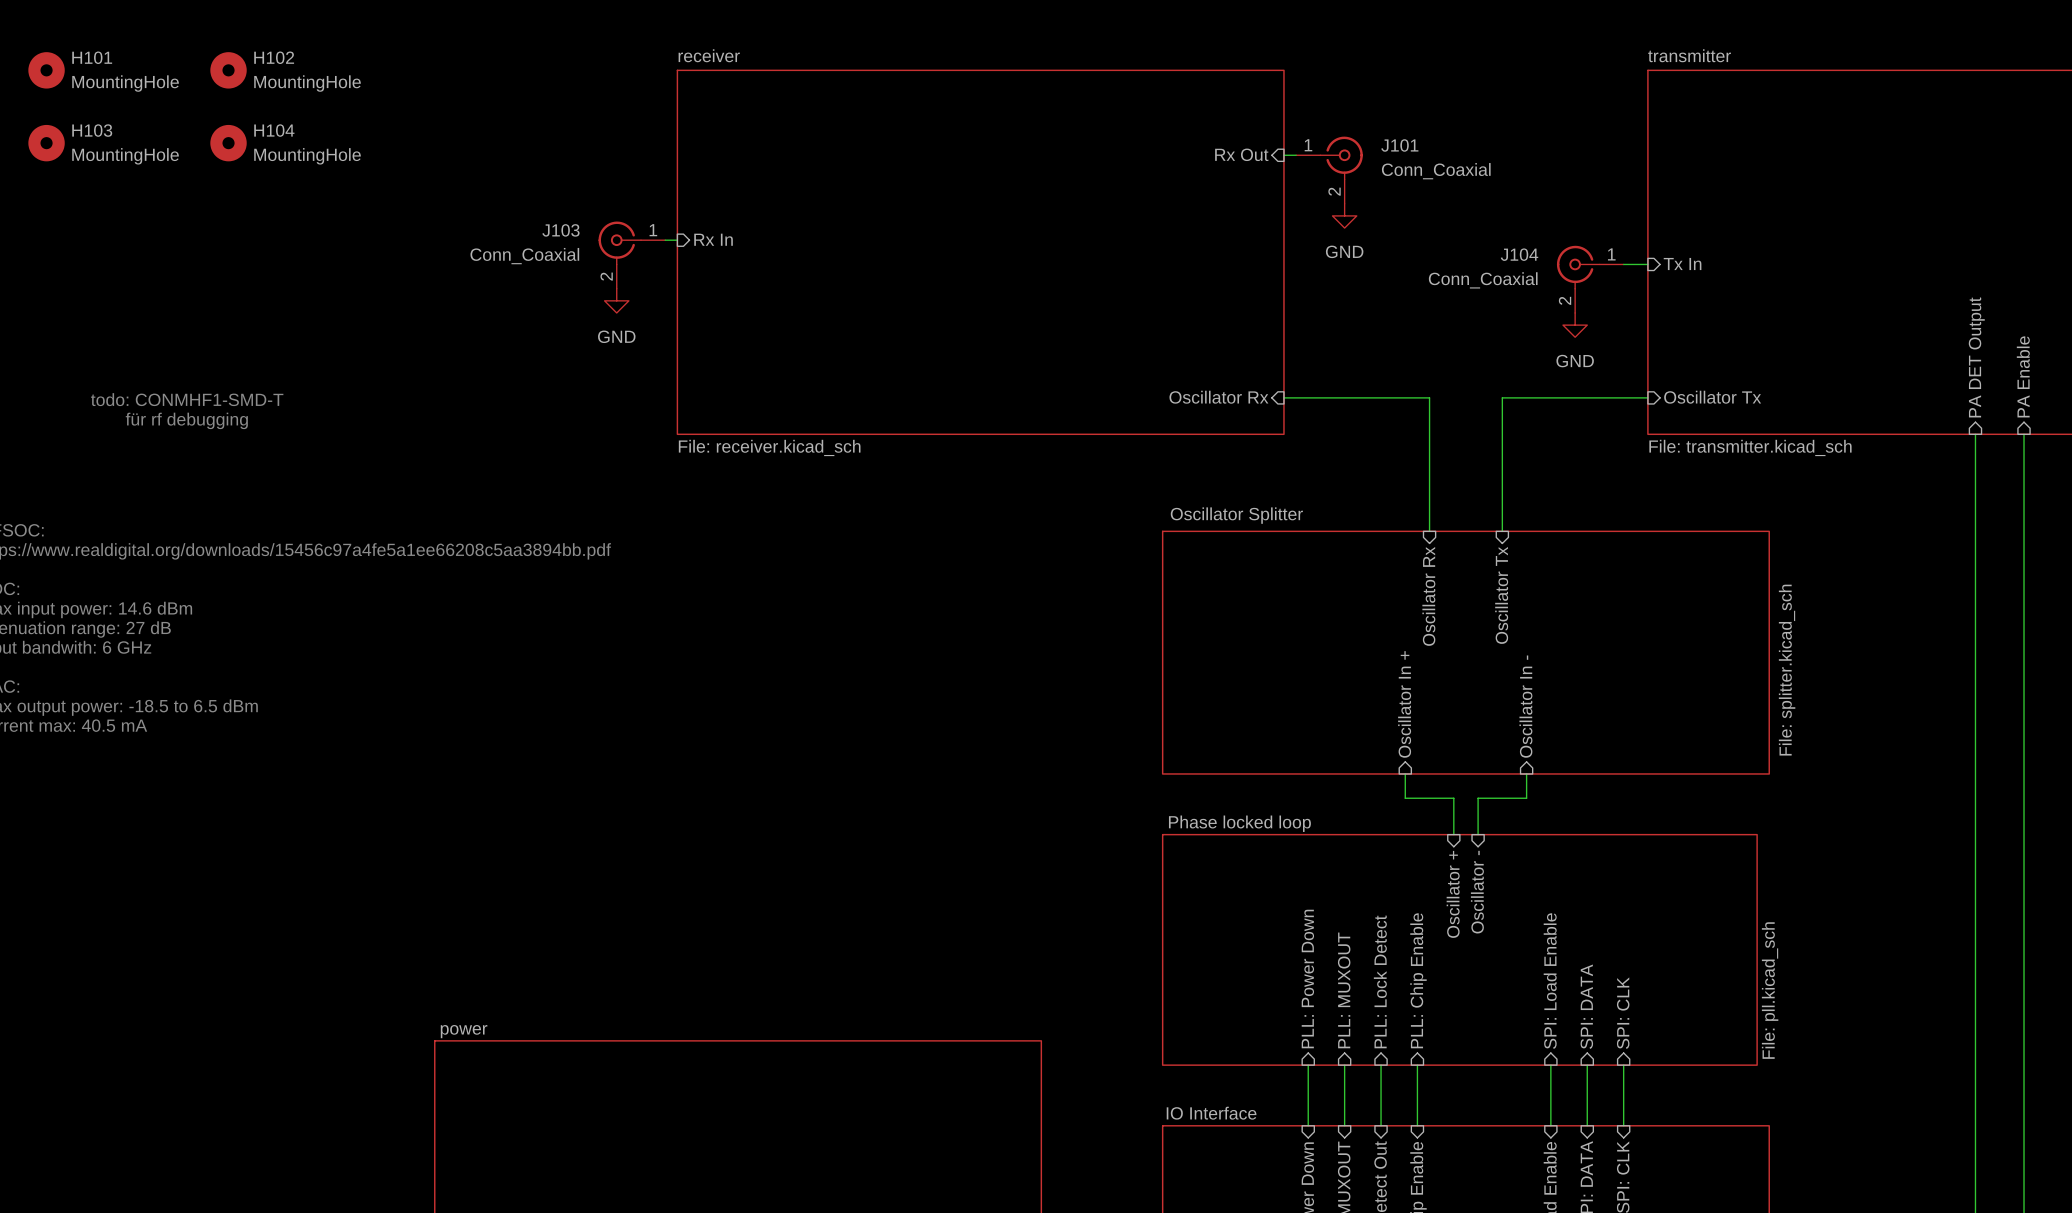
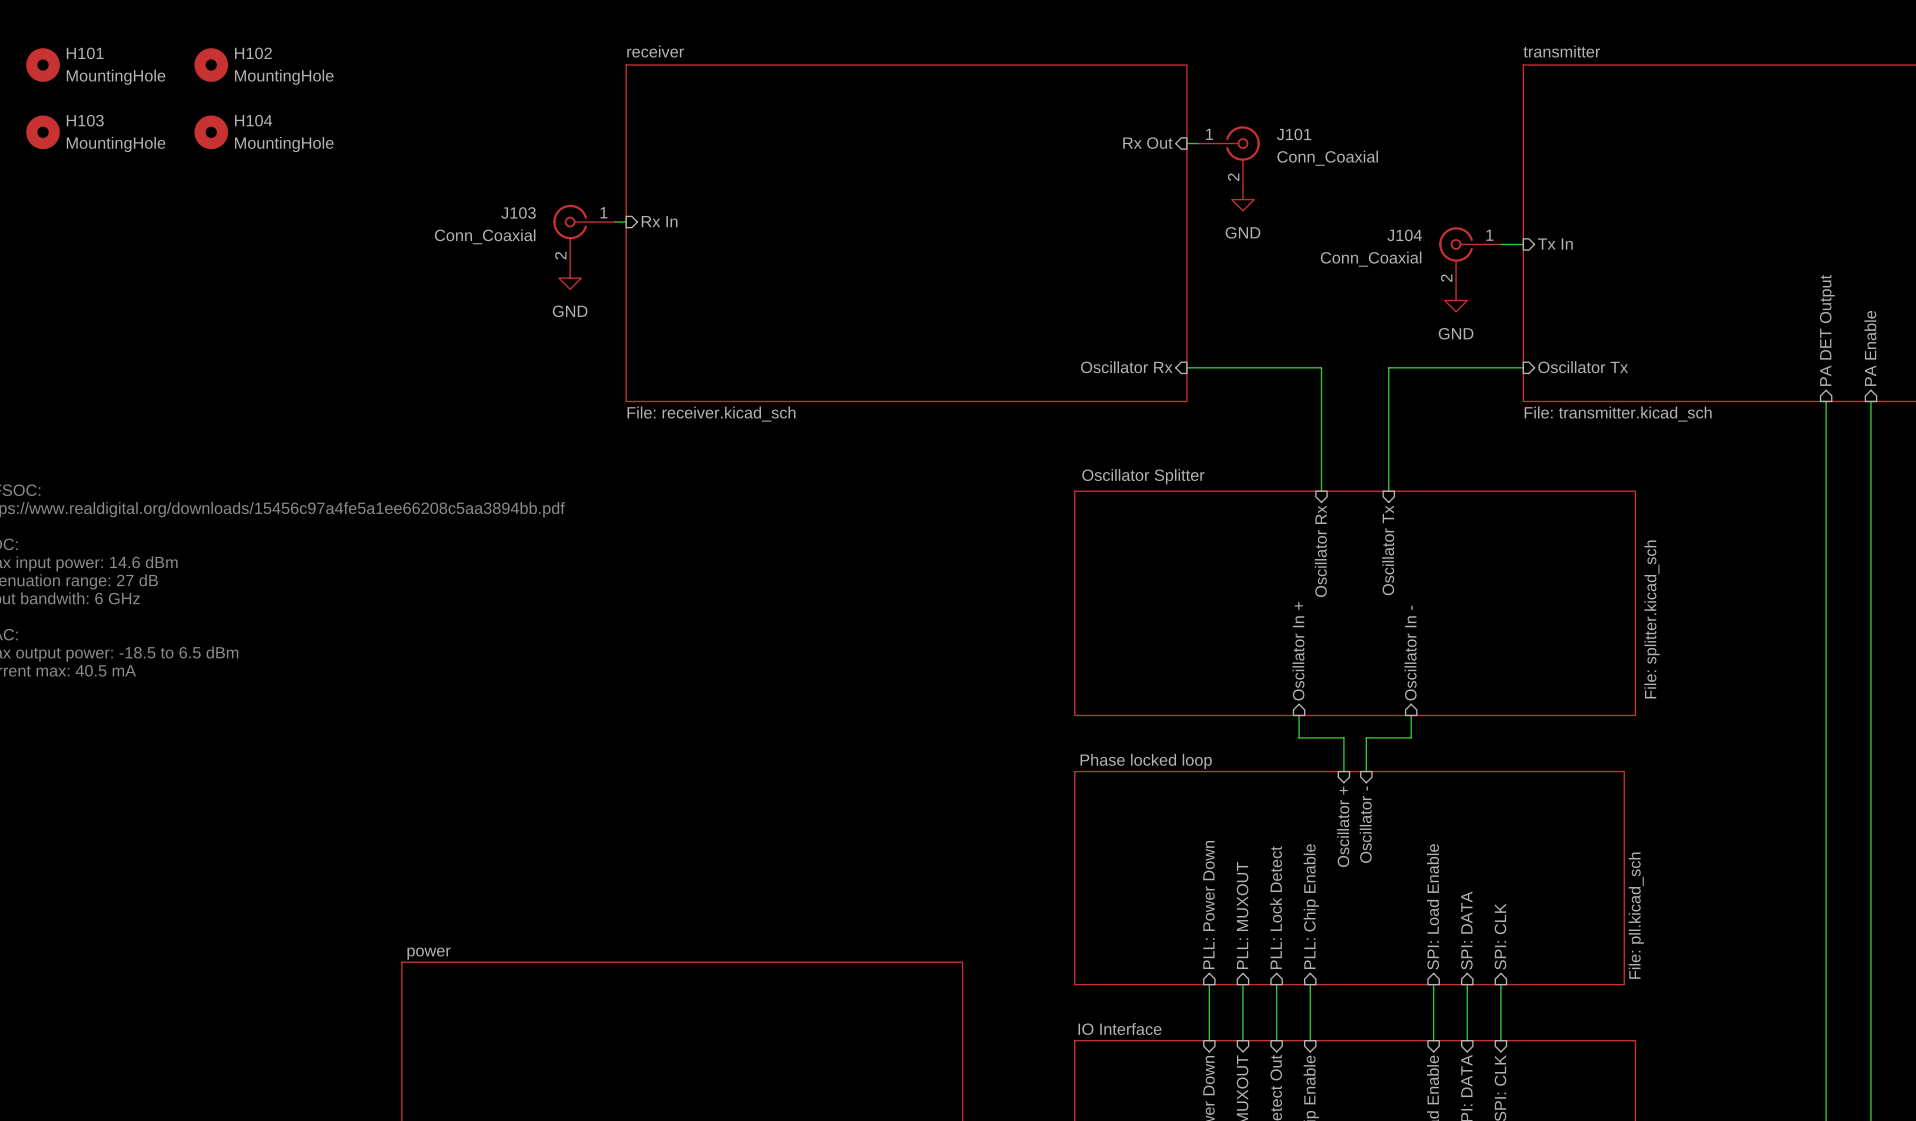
text: todo: CONMHF1-SMD-T (187, 399) -> none
text: für rf debugging (186, 420) -> none

